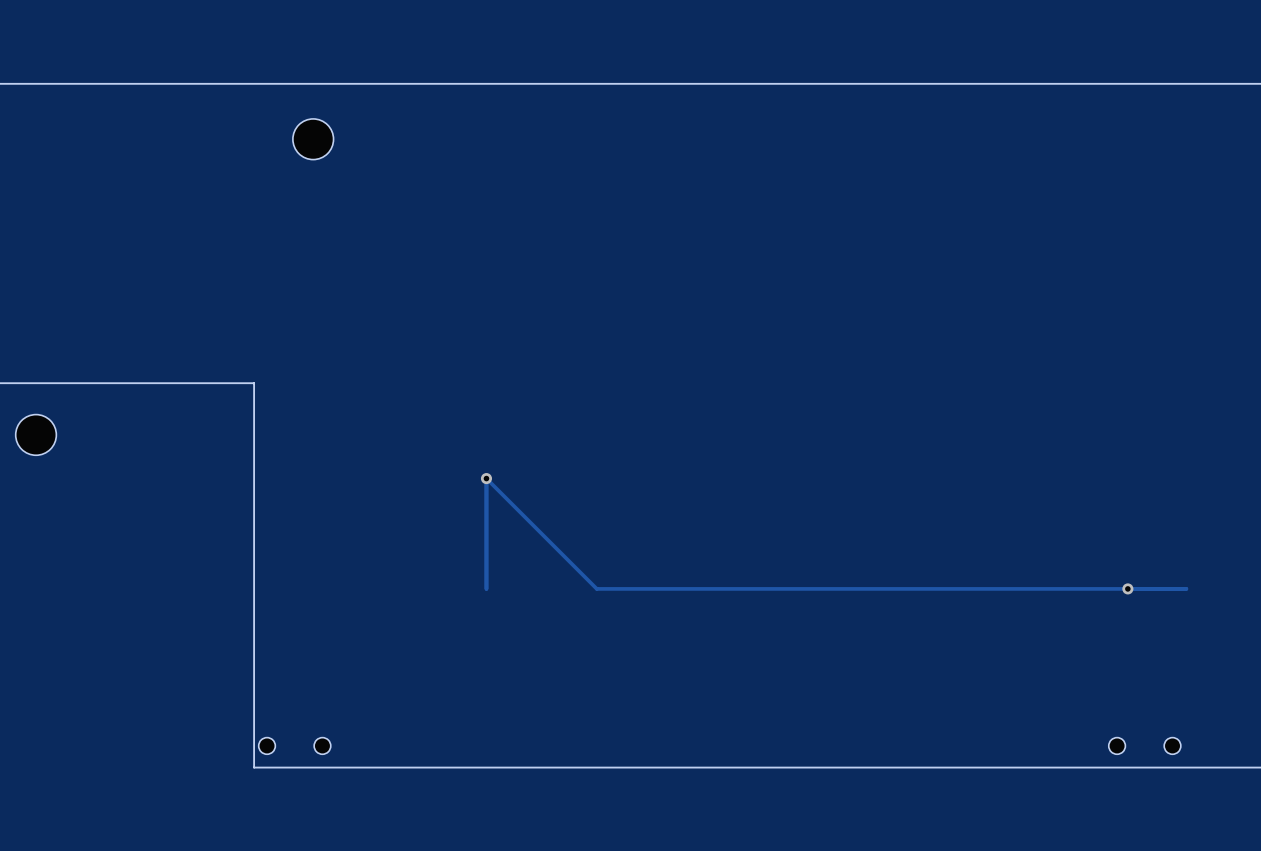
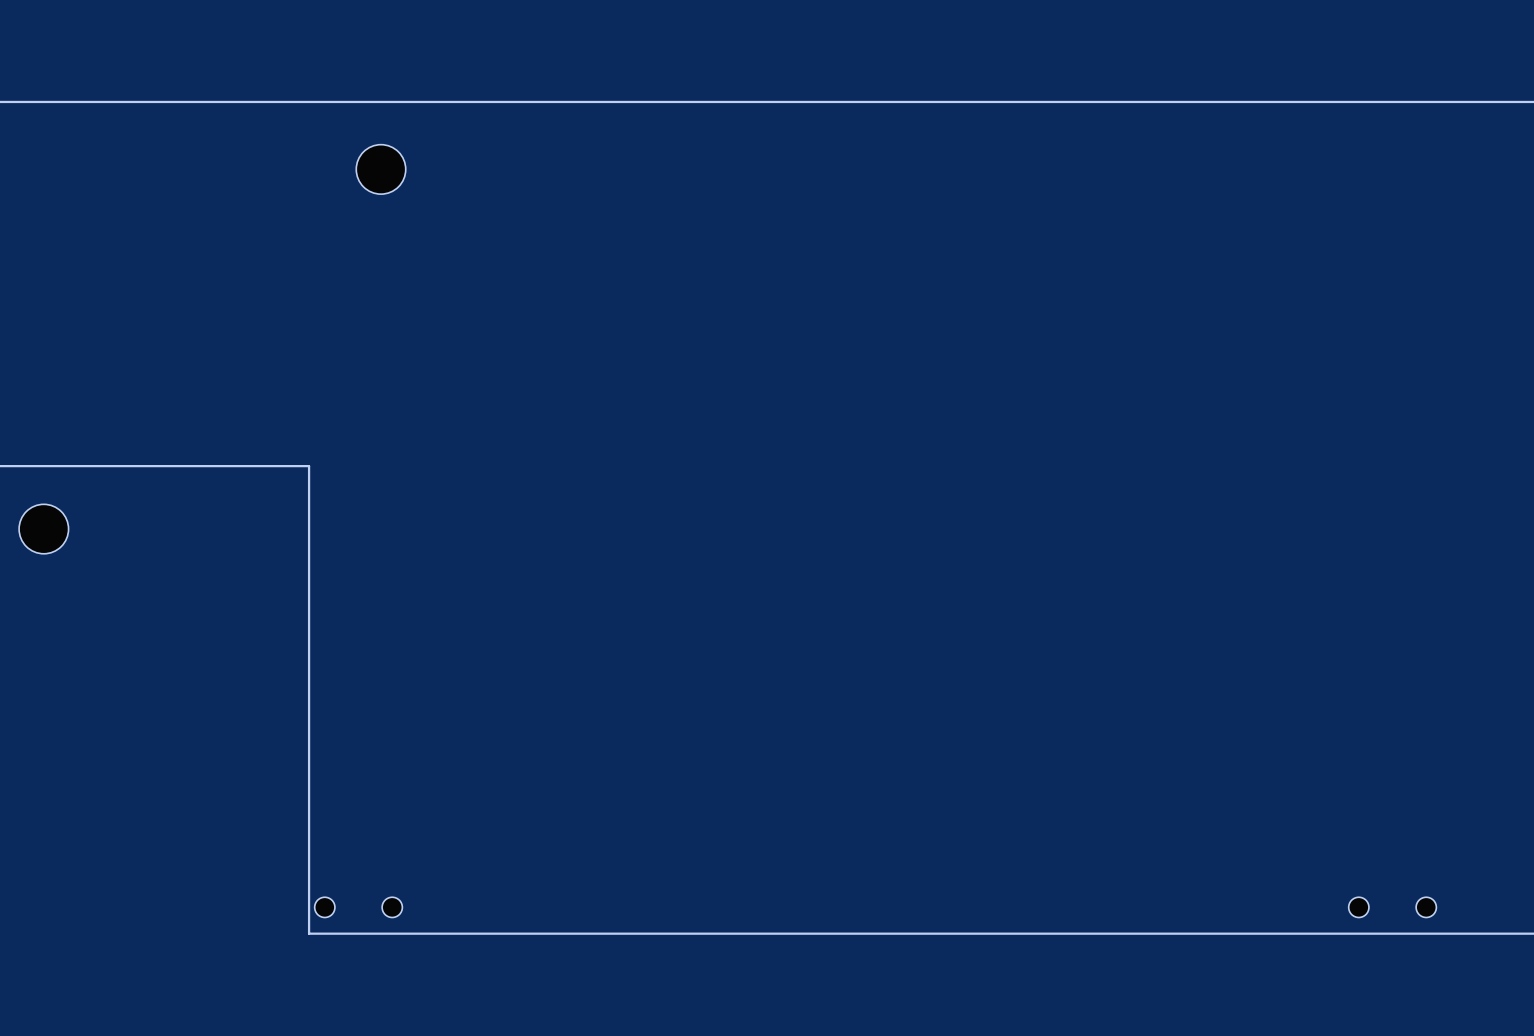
via: (486, 478) -> none
via: (1127, 588) -> none
track: (1186, 588) (596, 588) (486, 478) (486, 588) -> none

